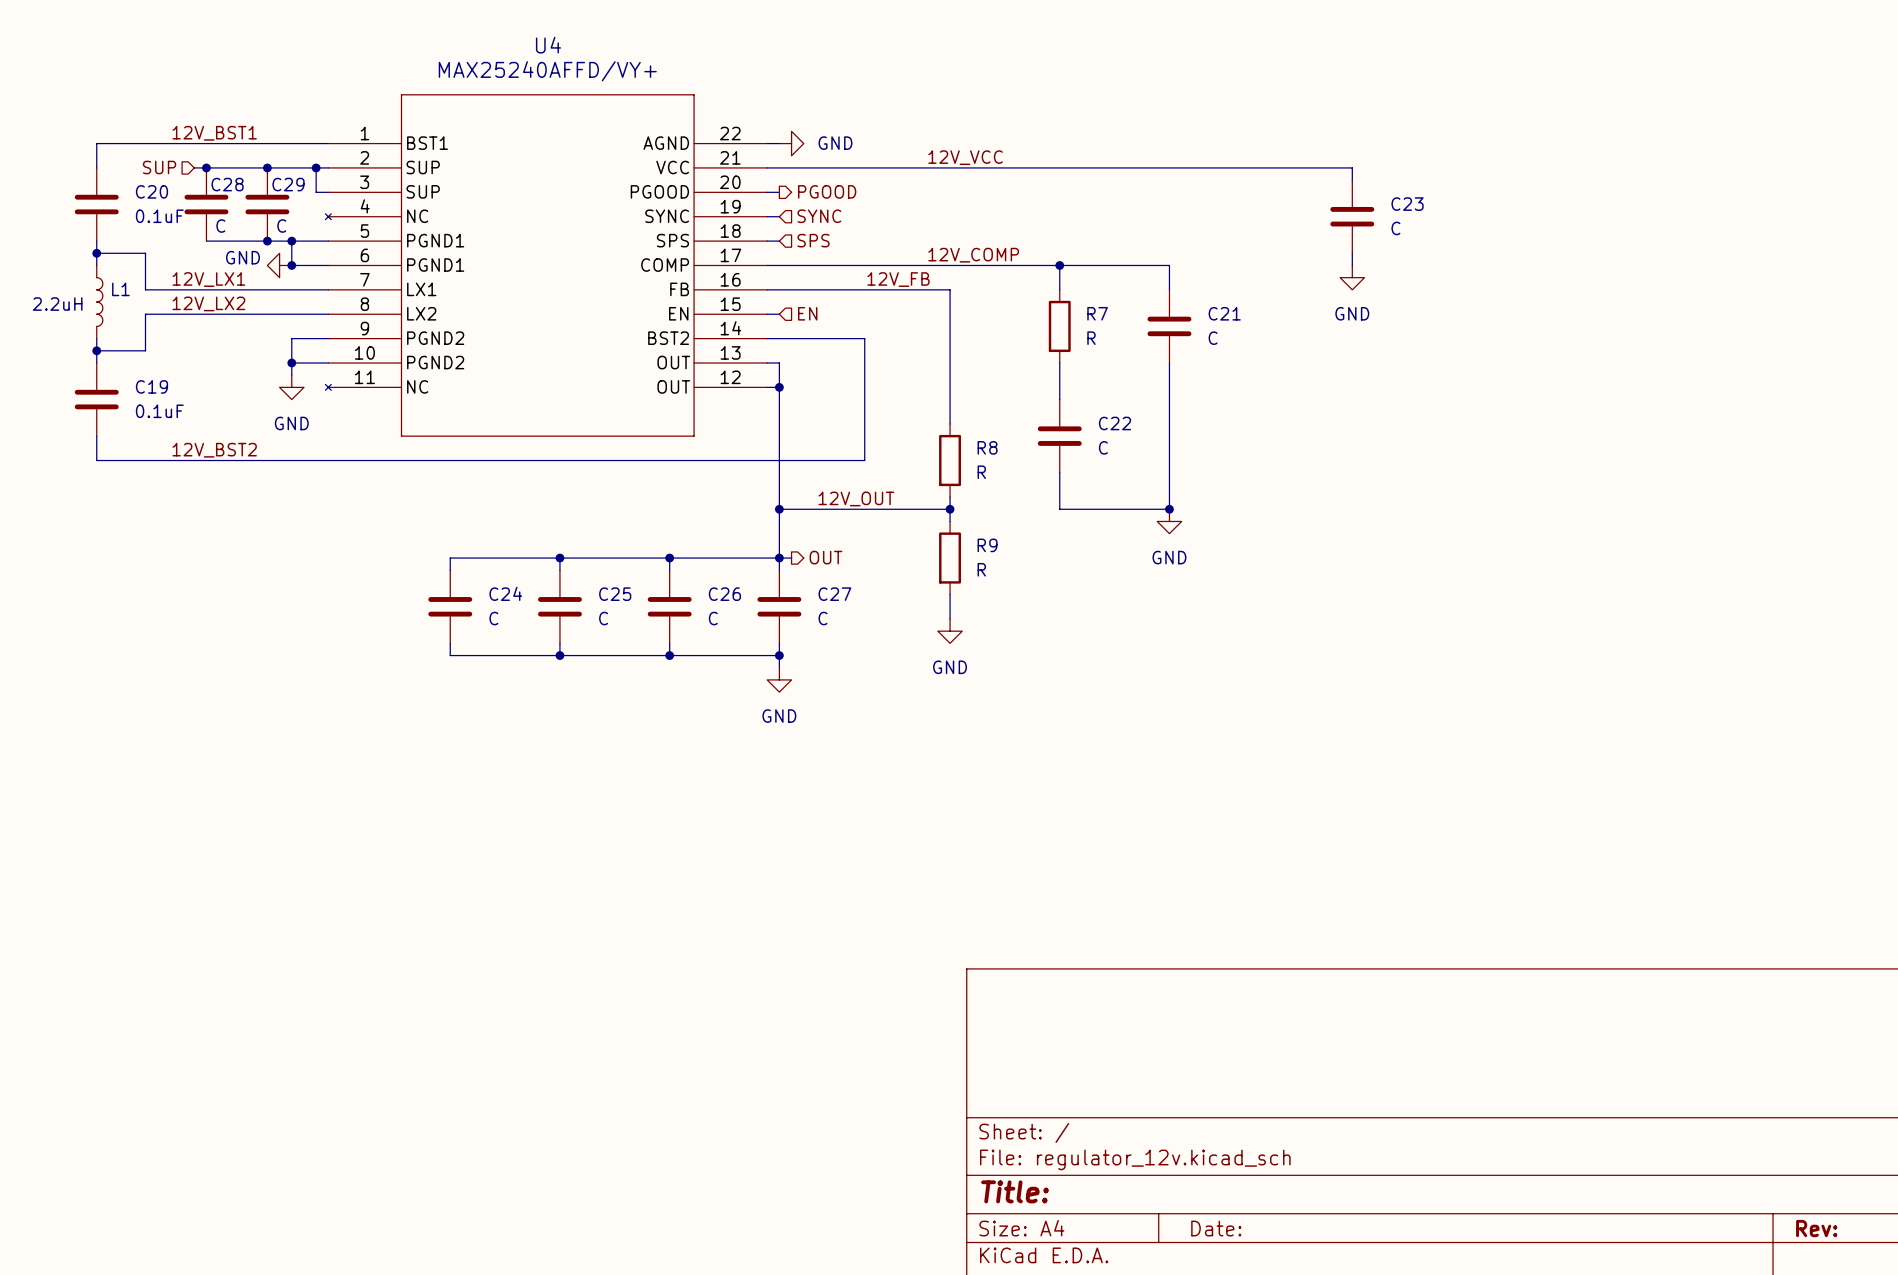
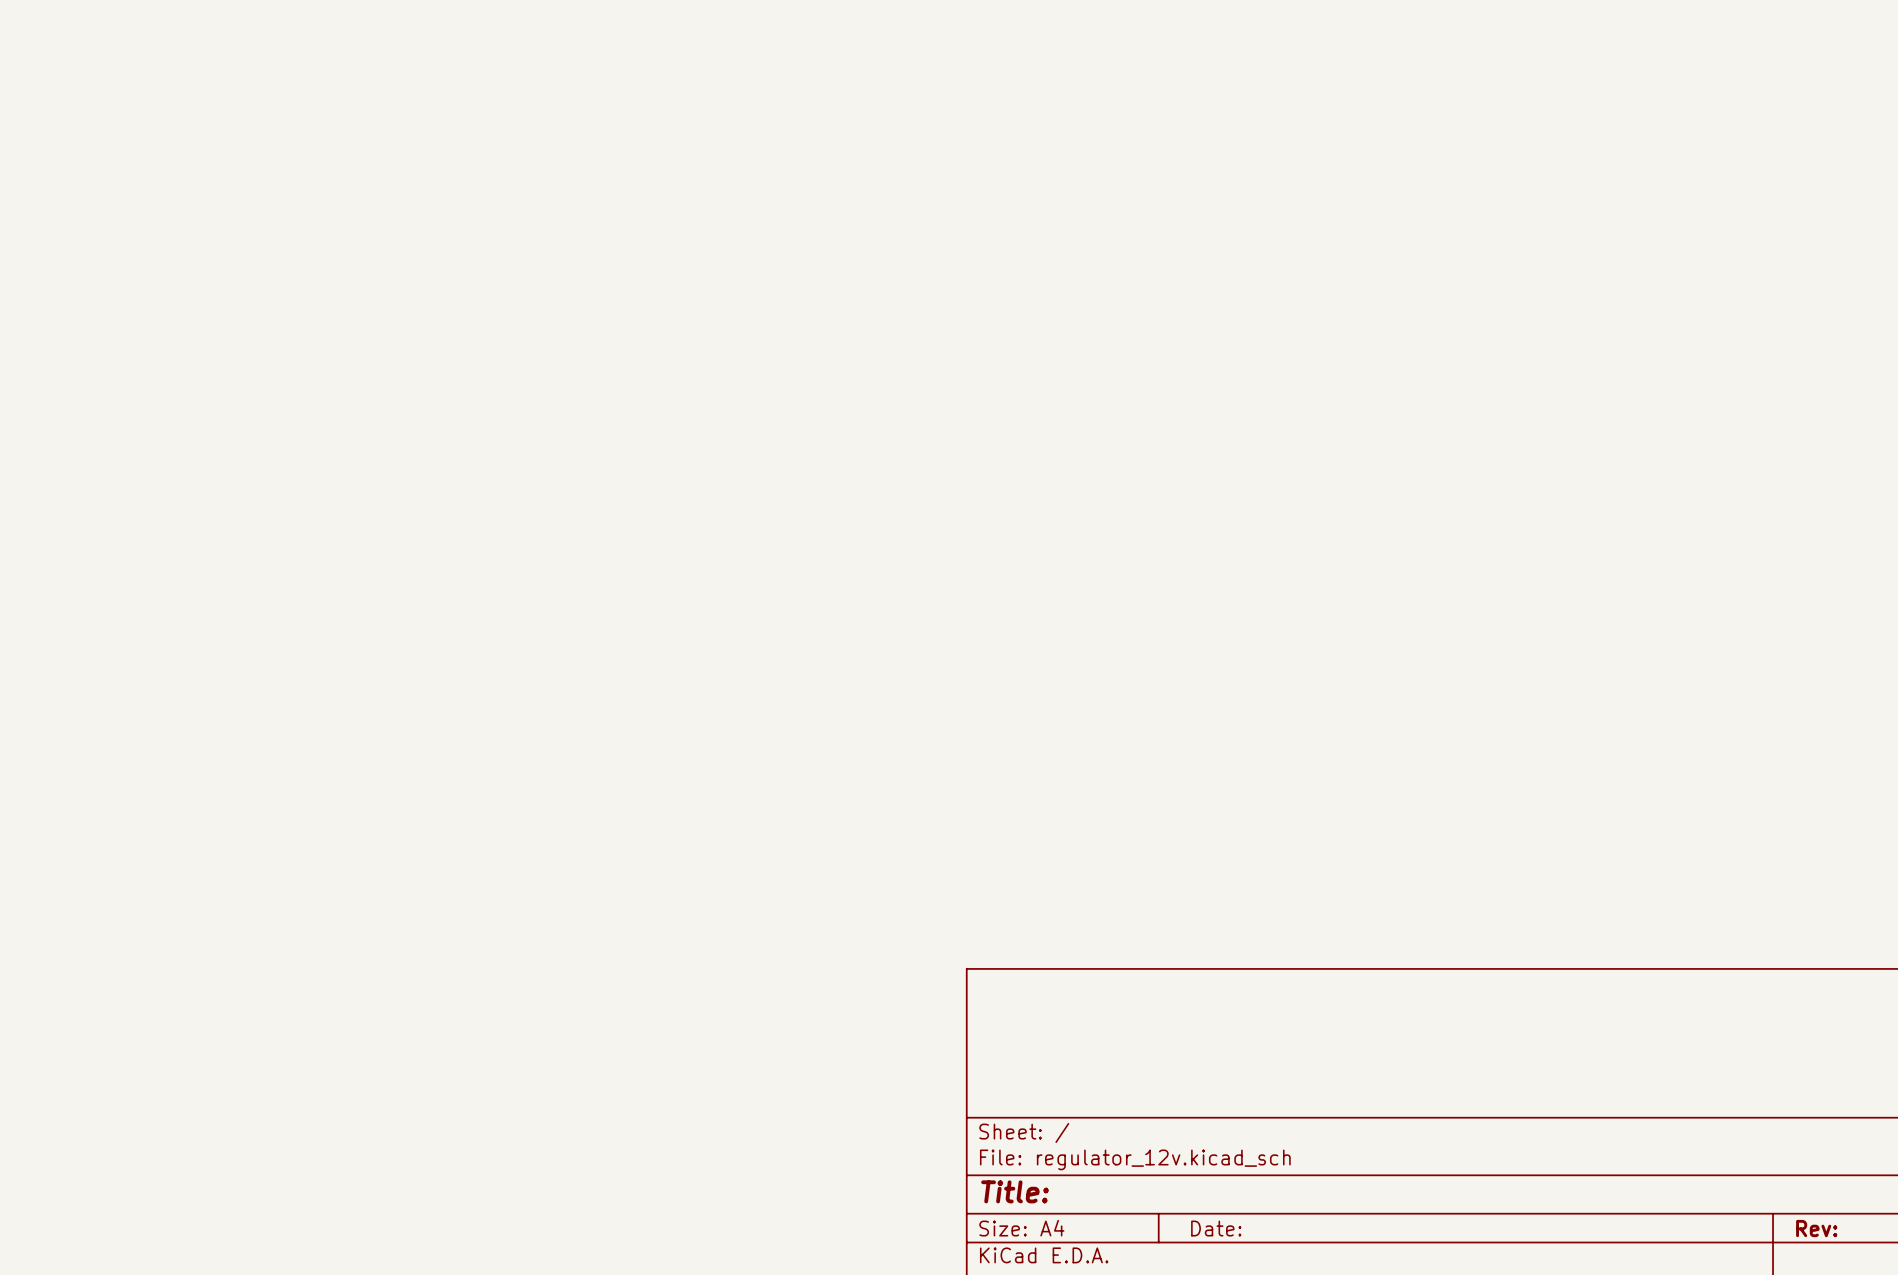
label: 12V_BST1 (214, 133) -> none
wire: (328, 143) (96, 143) (96, 167) -> none
wire: (767, 143) (779, 143) -> none
power symbol: GND (791, 143) -> none
label: 12V_VCC (965, 157) -> none
hierarchical label: SUP (159, 167) -> none
wire: (194, 167) (328, 167) -> none
junction: (206, 167) -> none
junction: (267, 167) -> none
wire: (316, 167) (316, 192) (328, 192) -> none
junction: (316, 167) -> none
wire: (767, 167) (1352, 167) (1352, 180) -> none
hierarchical label: PGOOD (827, 191) -> none
wire: (767, 192) (779, 192) -> none
C20: 0.1uF (96, 204) -> none
C28: C (206, 204) -> none
C29: C (267, 204) -> none
wire: (767, 216) (779, 216) -> none
hierarchical label: SYNC (819, 216) -> none
C23: C (1352, 216) -> none
hierarchical label: SPS (813, 240) -> none
wire: (96, 241) (96, 265) -> none
wire: (206, 241) (328, 241) -> none
junction: (267, 241) -> none
wire: (291, 241) (291, 265) (328, 265) -> none
junction: (291, 241) -> none
wire: (767, 241) (779, 241) -> none
wire: (96, 253) (145, 253) (145, 289) (328, 289) -> none
junction: (96, 253) -> none
wire: (1352, 253) (1352, 265) -> none
label: 12V_COMP (973, 255) -> none
power symbol: GND (279, 265) -> none
junction: (291, 265) -> none
U4: MAX25240AFFD/VY+ (546, 265) -> none
wire: (767, 265) (1169, 265) (1169, 289) -> none
wire: (1059, 265) (1059, 289) -> none
junction: (1059, 265) -> none
power symbol: GND (1352, 277) -> none
label: 12V_LX1 (208, 279) -> none
label: 12V_FB (898, 279) -> none
wire: (767, 289) (950, 289) (950, 423) -> none
L1: 2.2uH (99, 302) -> none
label: 12V_LX2 (208, 303) -> none
hierarchical label: EN (807, 313) -> none
wire: (328, 314) (145, 314) (145, 350) (96, 350) -> none
wire: (767, 314) (779, 314) -> none
R7: R (1059, 326) -> none
C21: C (1169, 326) -> none
wire: (96, 338) (96, 363) -> none
wire: (328, 338) (291, 338) (291, 375) -> none
wire: (767, 338) (864, 338) (864, 460) (96, 460) (96, 436) -> none
junction: (96, 350) -> none
wire: (291, 363) (328, 363) -> none
junction: (291, 363) -> none
wire: (767, 363) (779, 363) (779, 570) -> none
wire: (1059, 363) (1059, 399) -> none
wire: (1169, 363) (1169, 509) (1059, 509) (1059, 472) -> none
power symbol: GND (291, 387) -> none
wire: (767, 387) (779, 387) -> none
junction: (779, 387) -> none
C19: 0.1uF (96, 399) -> none
C22: C (1059, 436) -> none
label: 12V_BST2 (214, 450) -> none
R8: R (950, 460) -> none
wire: (950, 497) (950, 521) -> none
label: 12V_OUT (856, 498) -> none
wire: (779, 509) (950, 509) -> none
junction: (779, 509) -> none
junction: (950, 509) -> none
junction: (1169, 509) -> none
power symbol: GND (1169, 521) -> none
hierarchical label: OUT (826, 557) -> none
wire: (559, 558) (559, 570) -> none
junction: (559, 558) -> none
wire: (669, 558) (669, 570) -> none
junction: (669, 558) -> none
junction: (779, 558) -> none
wire: (791, 558) (450, 558) (450, 570) -> none
R9: R (950, 558) -> none
wire: (950, 594) (950, 618) -> none
C24: C (450, 606) -> none
C25: C (559, 606) -> none
C26: C (669, 606) -> none
C27: C (779, 606) -> none
power symbol: GND (950, 631) -> none
wire: (450, 643) (450, 655) (779, 655) -> none
wire: (559, 643) (559, 655) -> none
wire: (669, 643) (669, 655) -> none
wire: (779, 643) (779, 667) -> none
junction: (559, 655) -> none
junction: (669, 655) -> none
junction: (779, 655) -> none
power symbol: GND (779, 679) -> none

